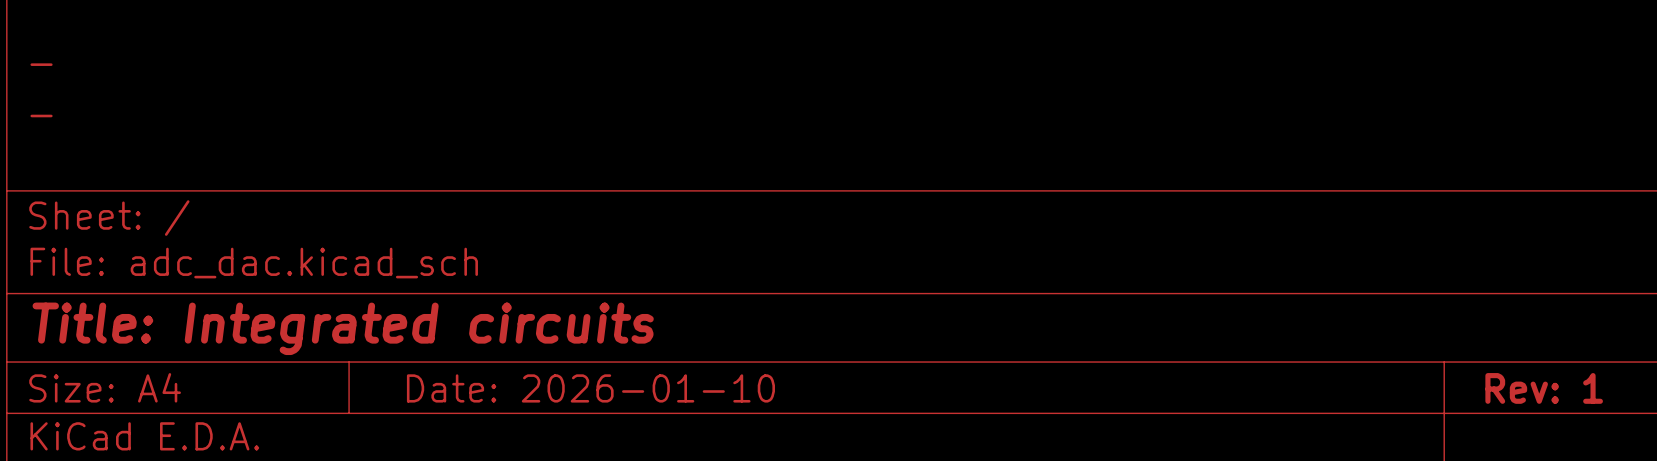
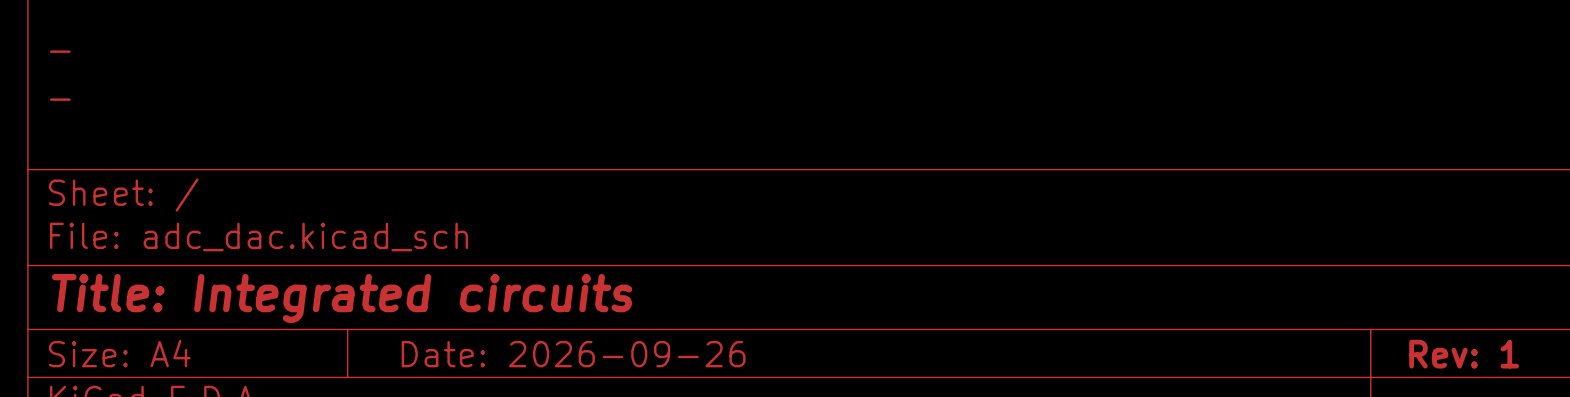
title block: Date: 2026-01-10 (590, 388) -> Date: 2026-09-26 (573, 354)

